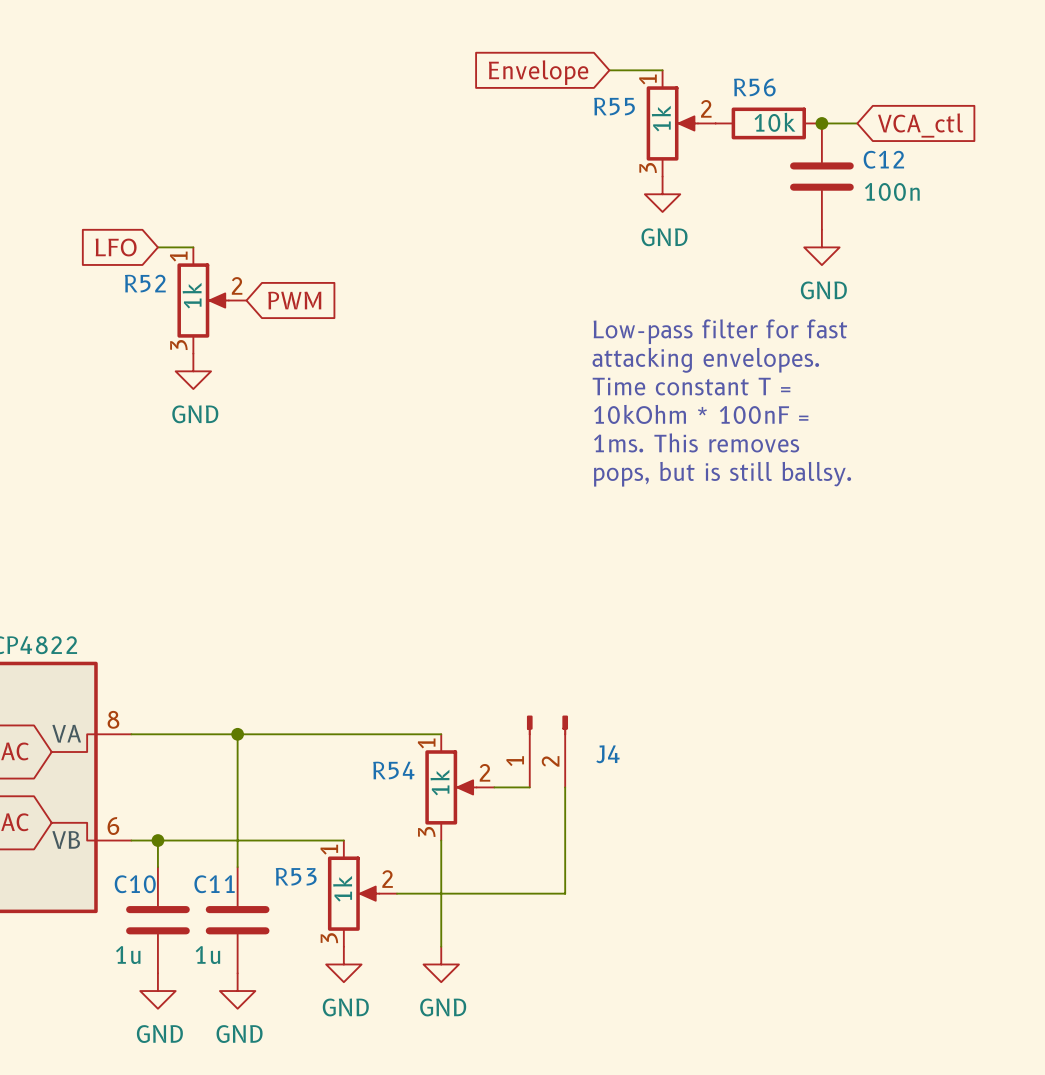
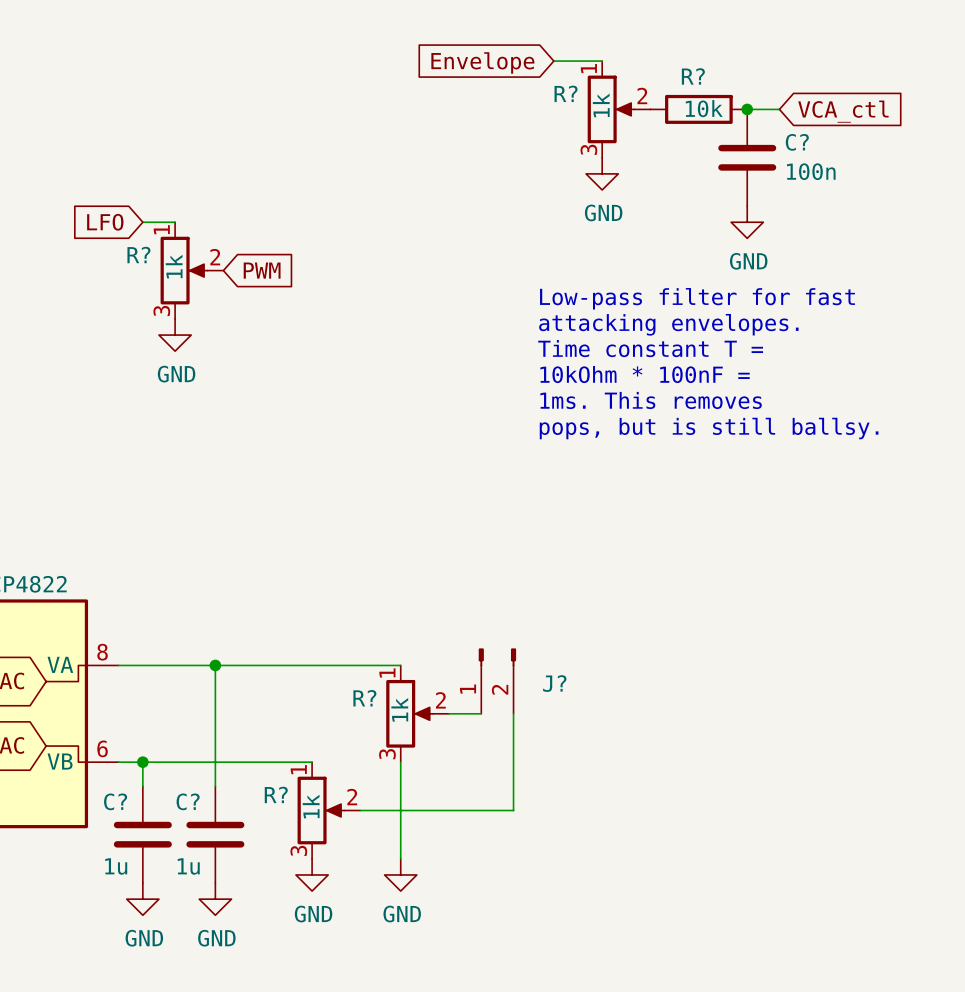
R56 name: R56 (754, 87) -> R? (693, 76)
R55 name: R55 (614, 106) -> R? (566, 93)
C12 name: C12 (883, 159) -> C? (797, 142)
R52 name: R52 (145, 283) -> R? (138, 255)
J4 name: J4 (607, 754) -> J? (554, 683)
R54 name: R54 (393, 770) -> R? (364, 698)
R53 name: R53 (296, 876) -> R? (276, 794)
C10 name: C10 (135, 884) -> C? (115, 801)
C11 name: C11 (214, 884) -> C? (188, 801)

